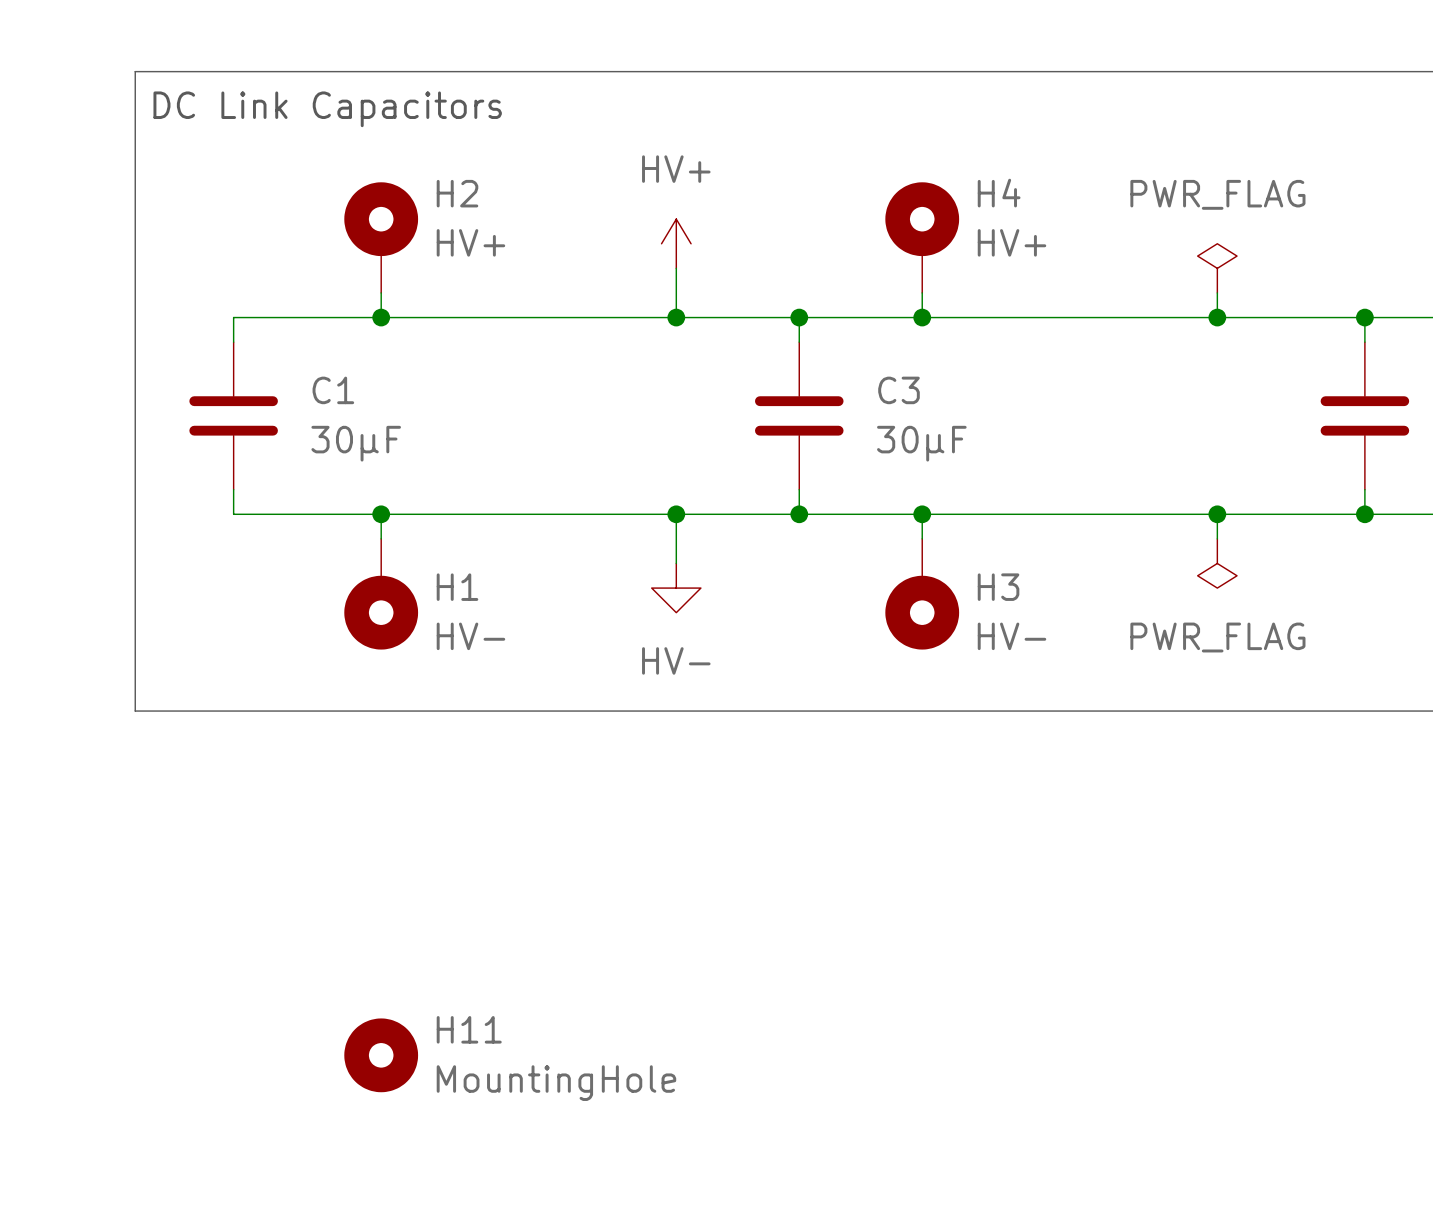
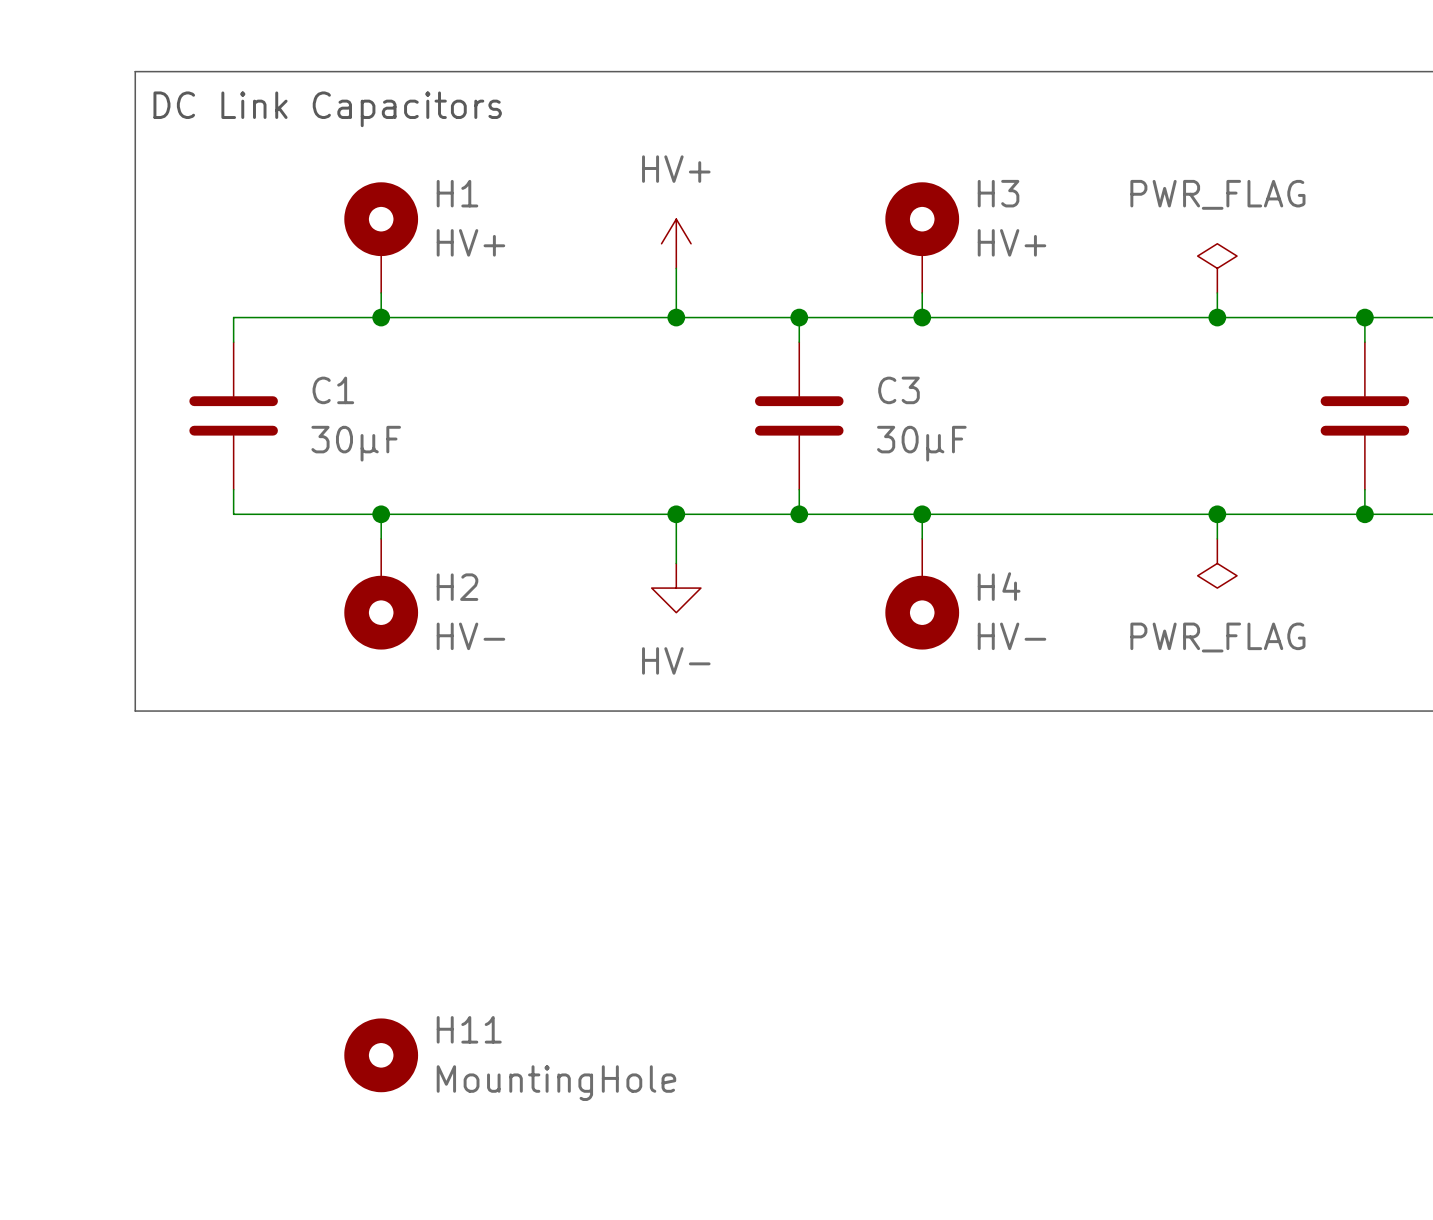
H2 name: H2 (457, 193) -> H1 (457, 193)
H4 name: H4 (999, 193) -> H3 (998, 193)
H1 name: H1 (457, 587) -> H2 (457, 587)
H3 name: H3 (998, 587) -> H4 (999, 586)

